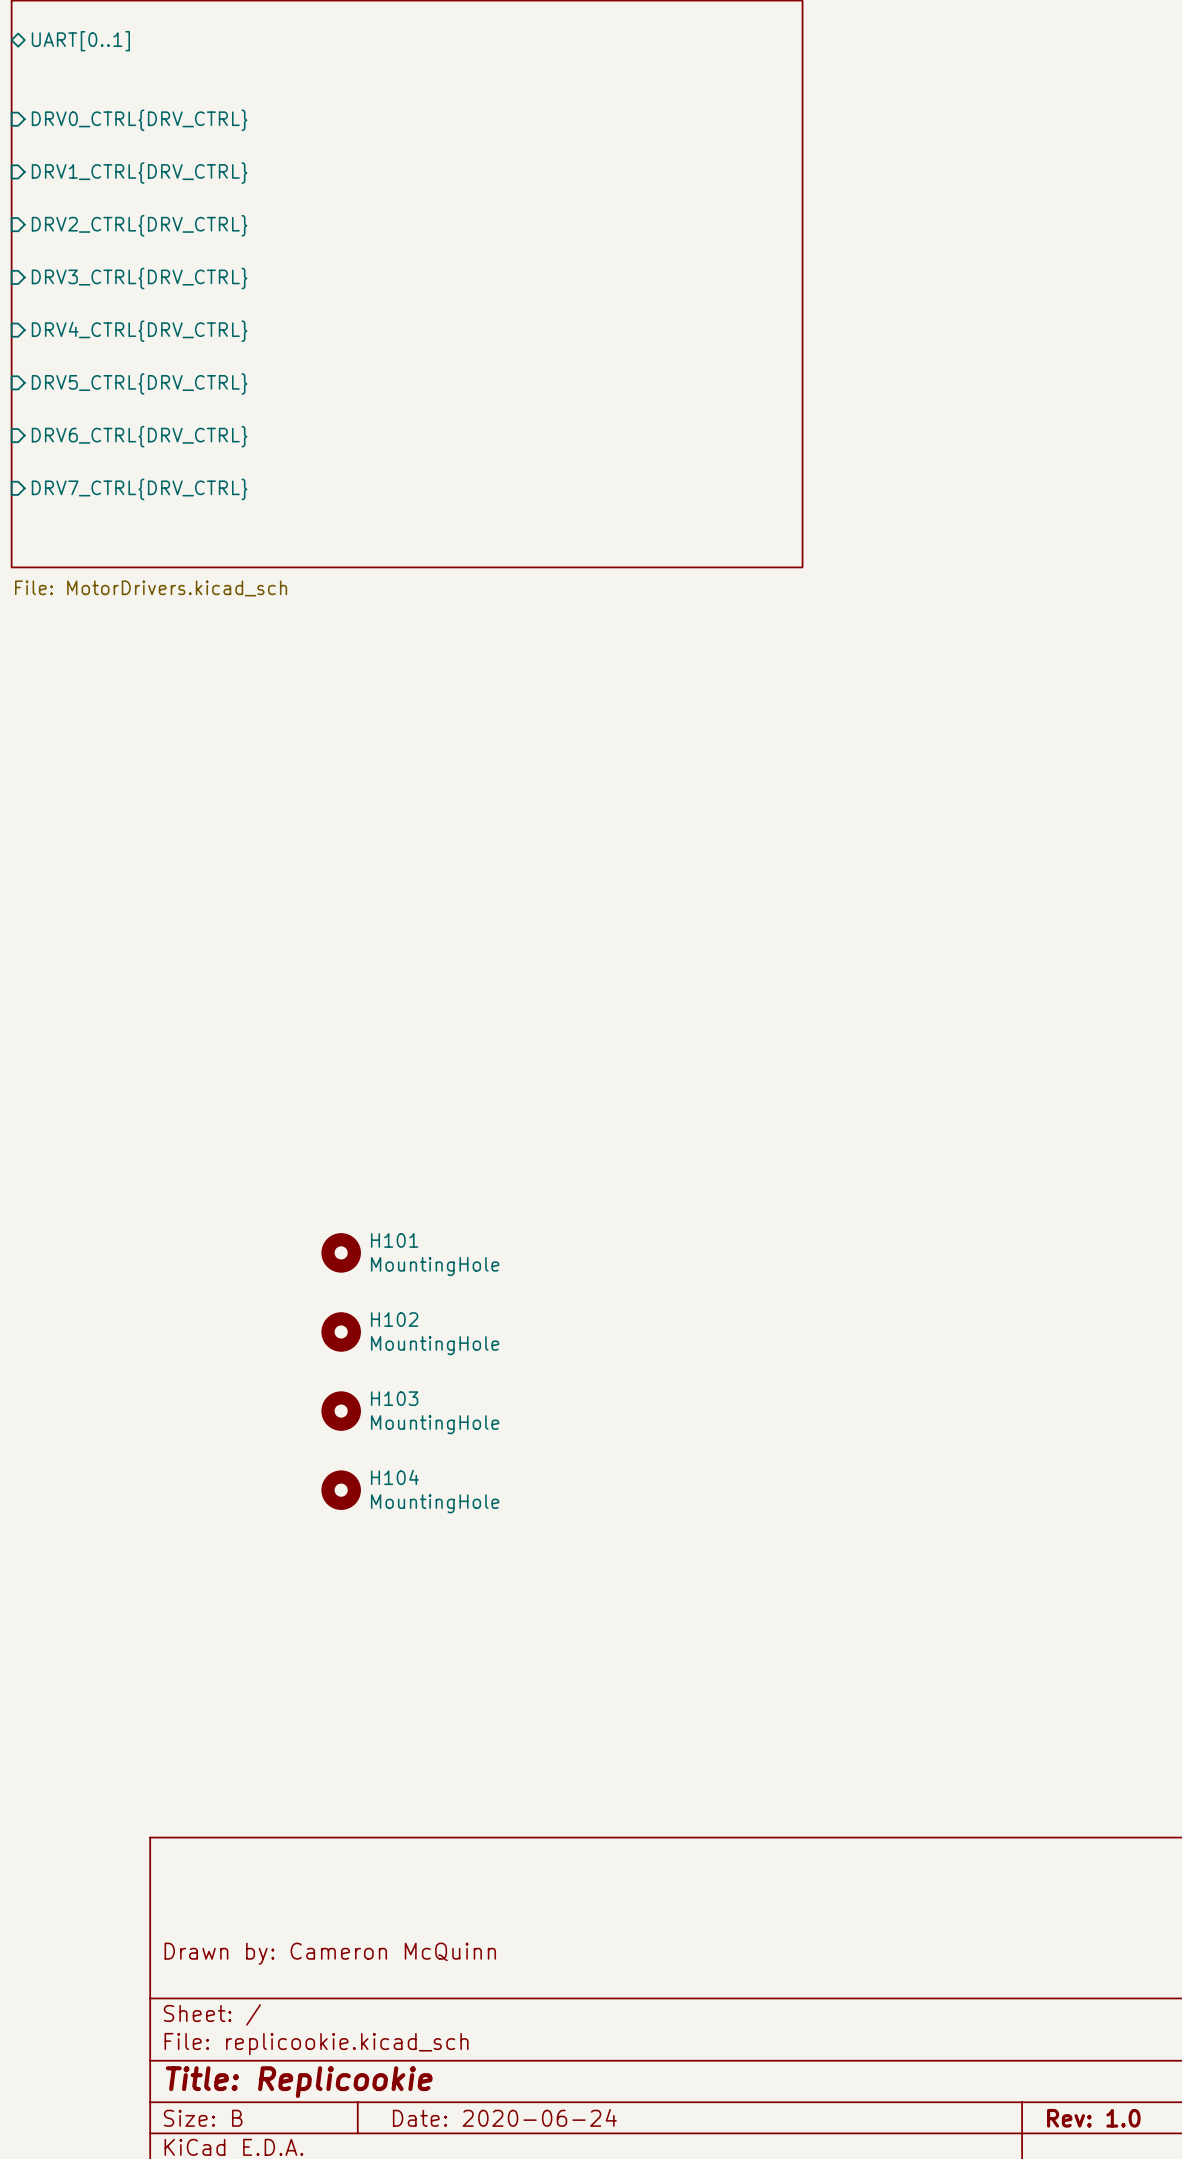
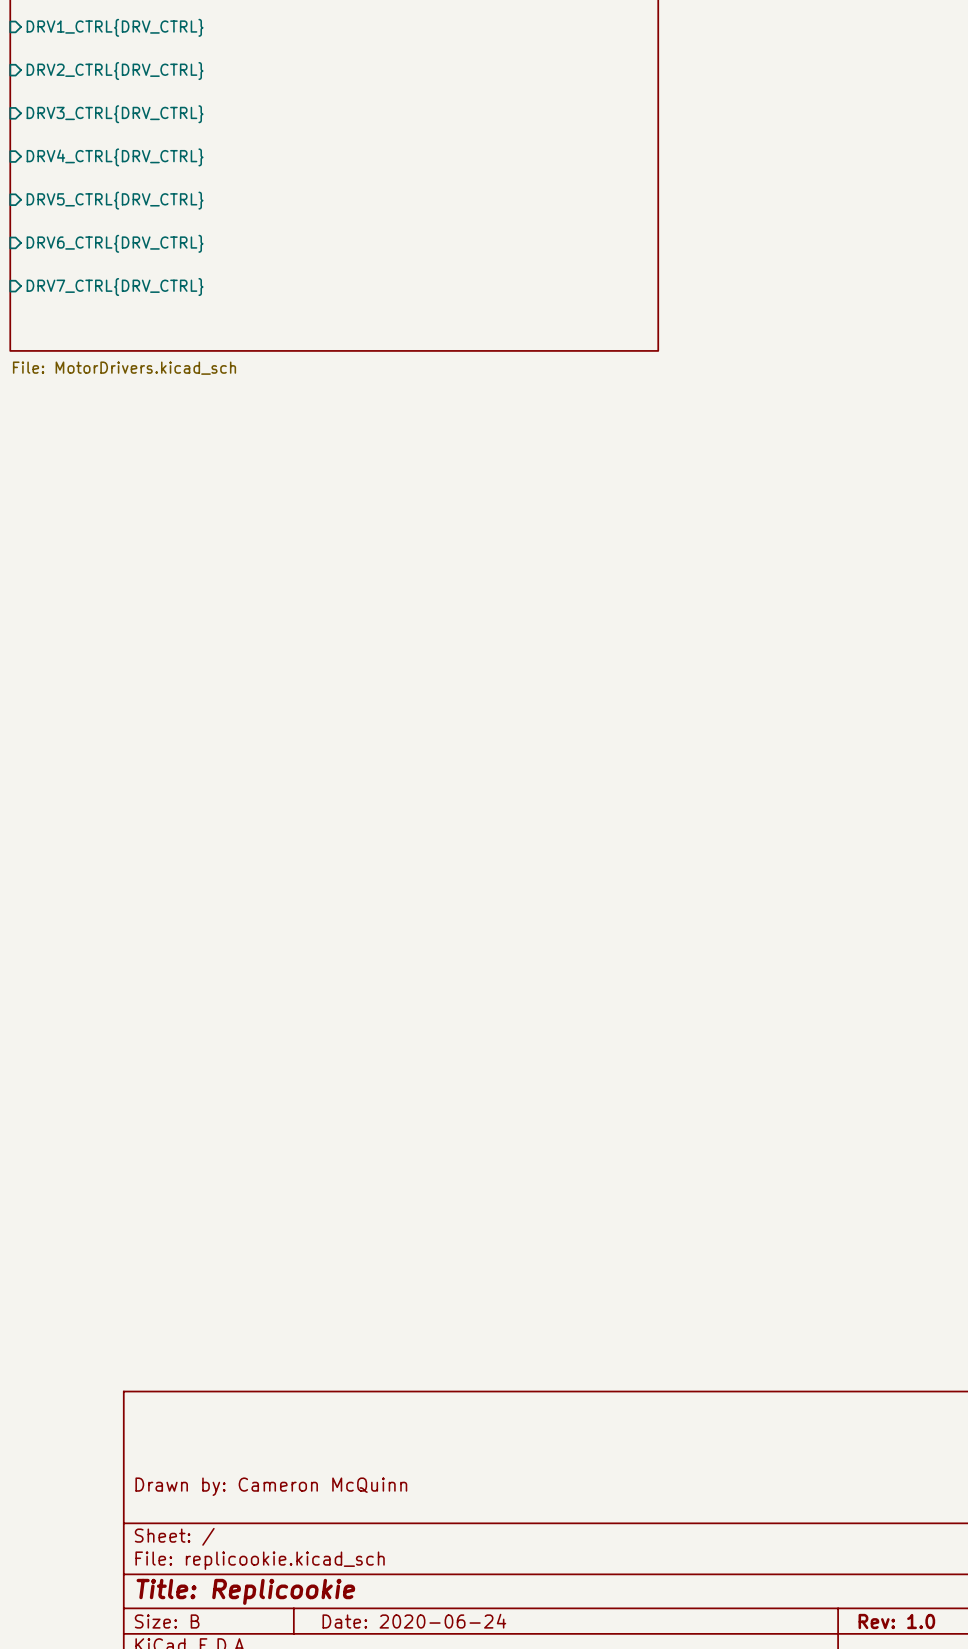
H101: MountingHole (341, 1252) -> none
H102: MountingHole (341, 1331) -> none
H103: MountingHole (341, 1411) -> none
H104: MountingHole (341, 1490) -> none

